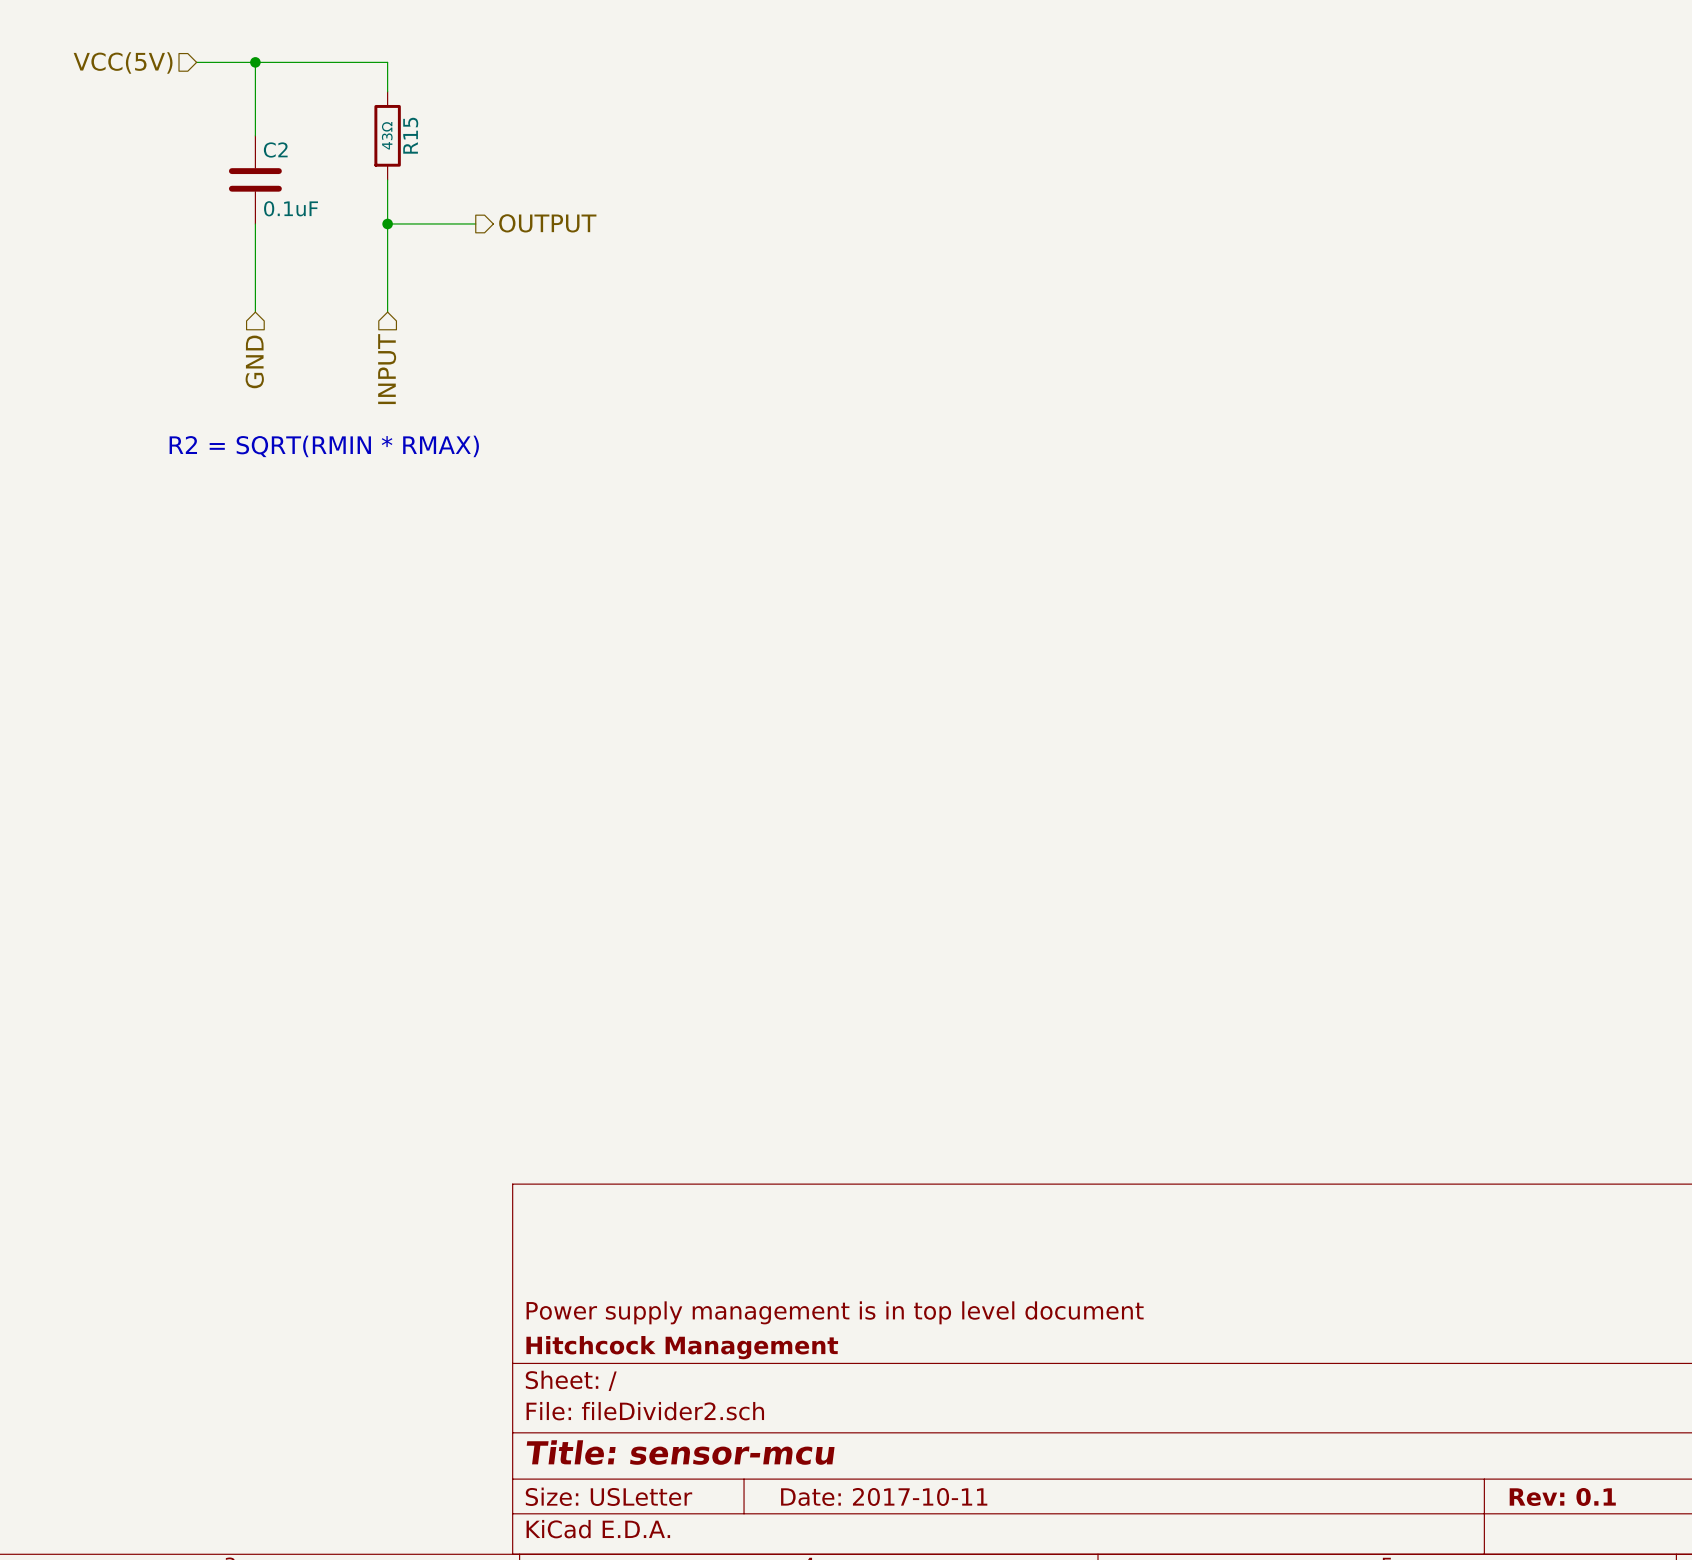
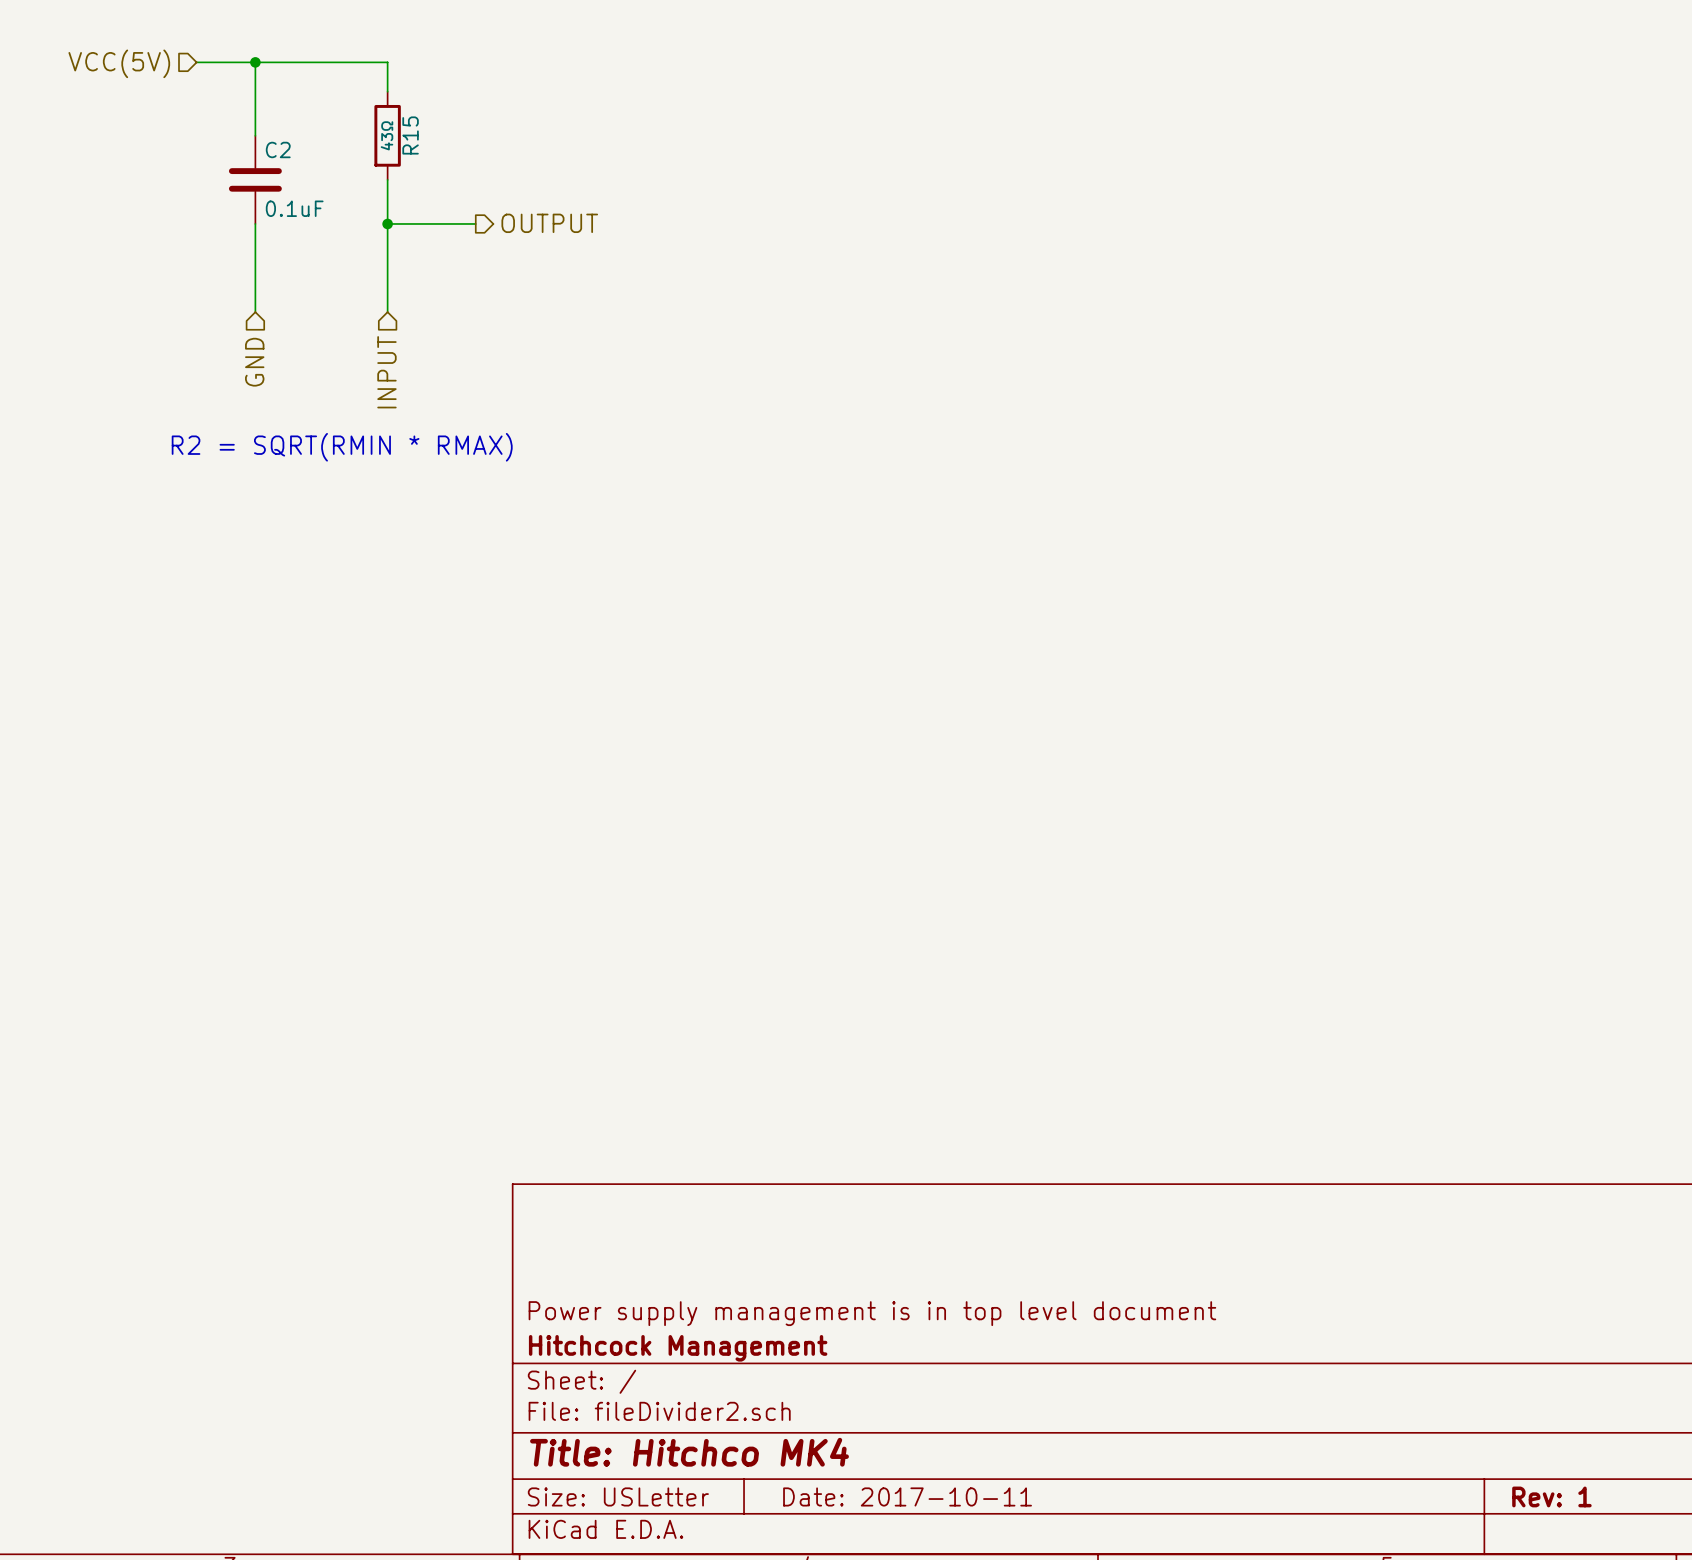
title block: Title: sensor-mcu (680, 1452) -> Title: Hitchco MK4 (689, 1452)
title block: Rev: 0.1 (1562, 1496) -> Rev: 1 (1551, 1496)

